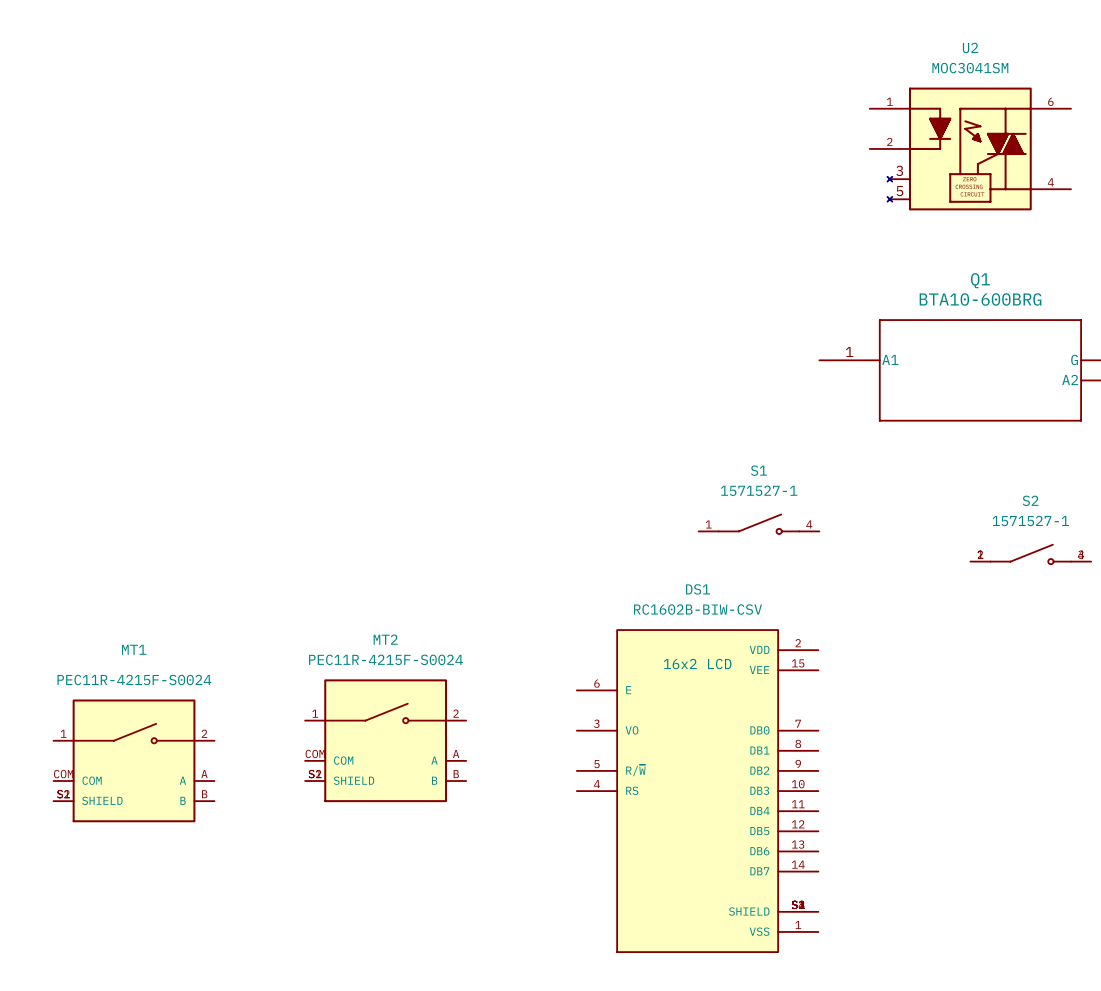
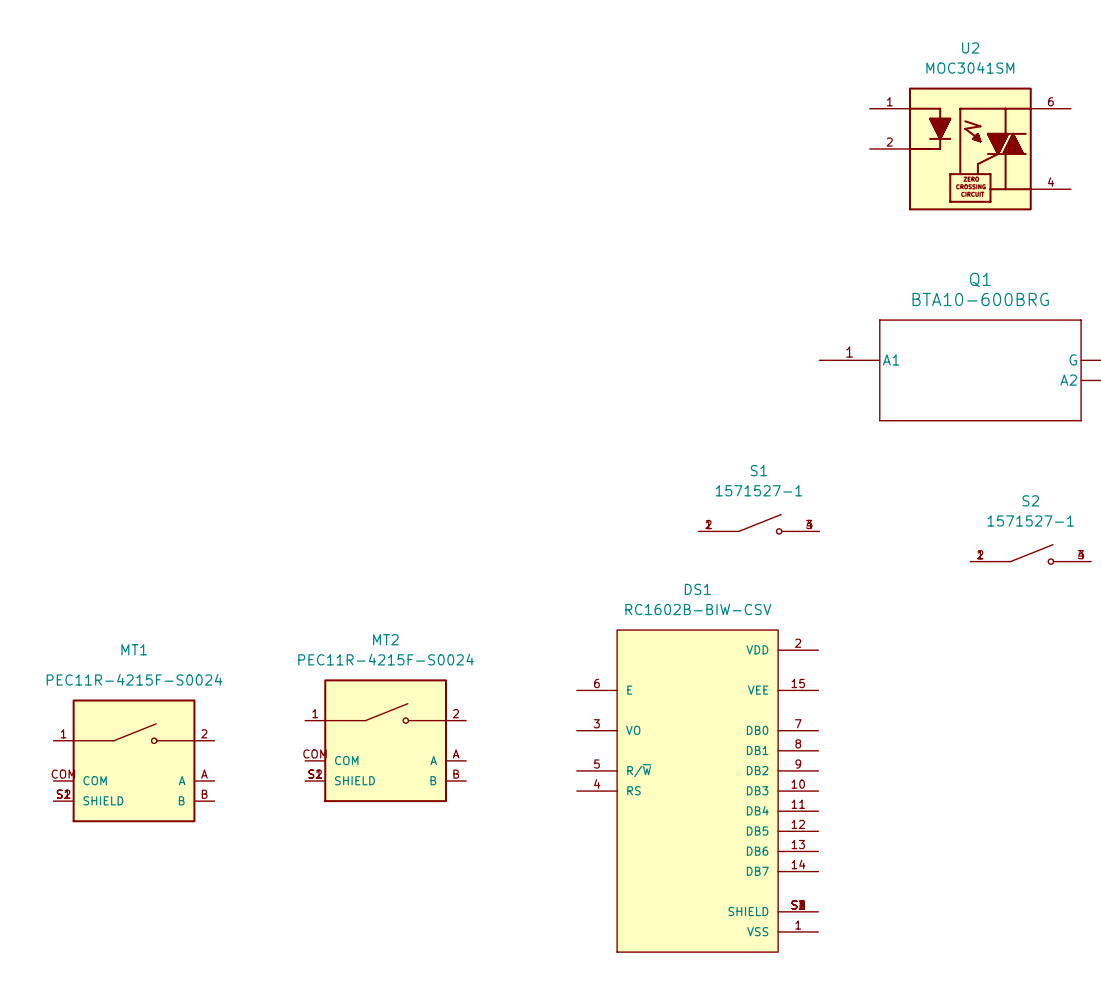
U2 symbol: [869, 87, 1072, 211] -> [869, 87, 1072, 211]
S1 symbol: [698, 513, 820, 535] -> [698, 513, 820, 535]
DS1 symbol: [576, 629, 819, 953] -> [576, 629, 819, 953]
DS1 text: 16x2 LCD (697, 664) -> none

